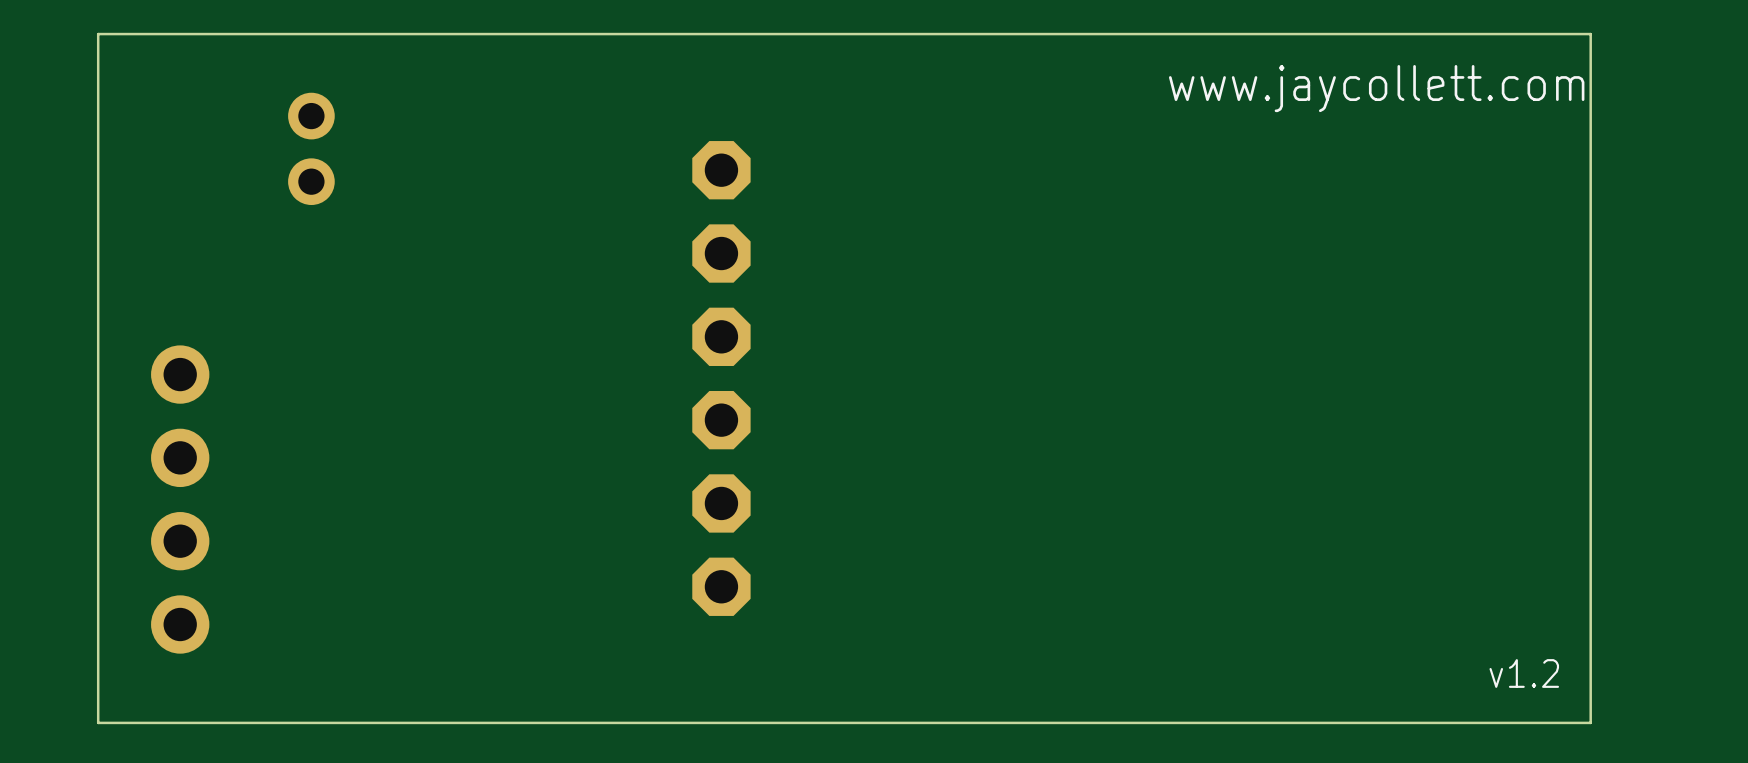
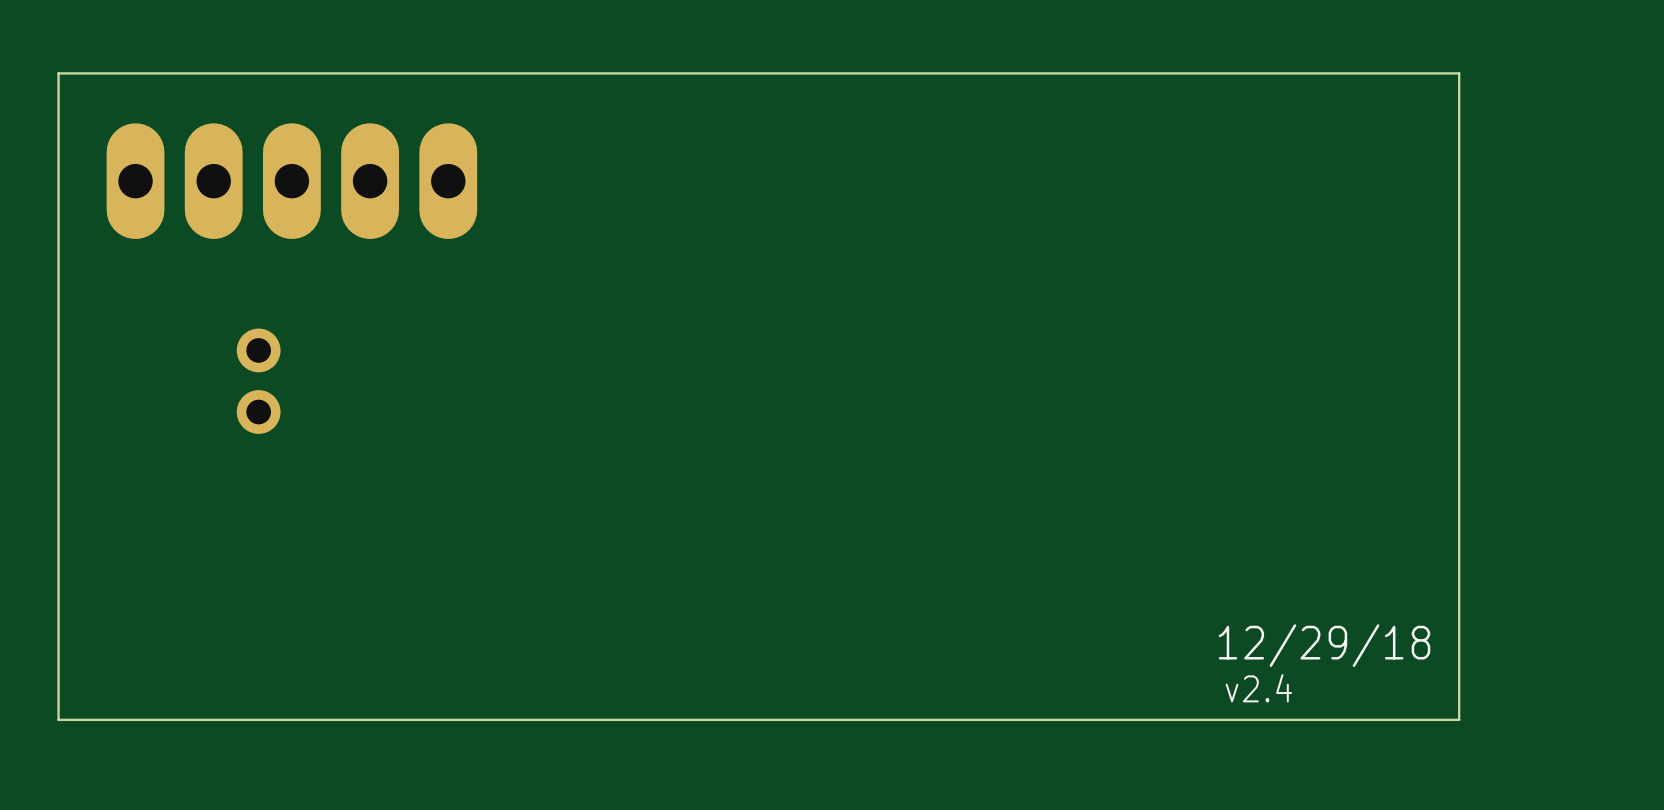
text: www.jaycollett.com (1376, 88) -> none
part position: (311, 148) -> (258, 381)
part: none -> (291, 181)
part: (721, 378) -> none
part: (180, 499) -> none
text: none -> 12/29/18 (1324, 645)
text: v1.2 (1524, 673) -> none
text: none -> v2.4 (1258, 688)

